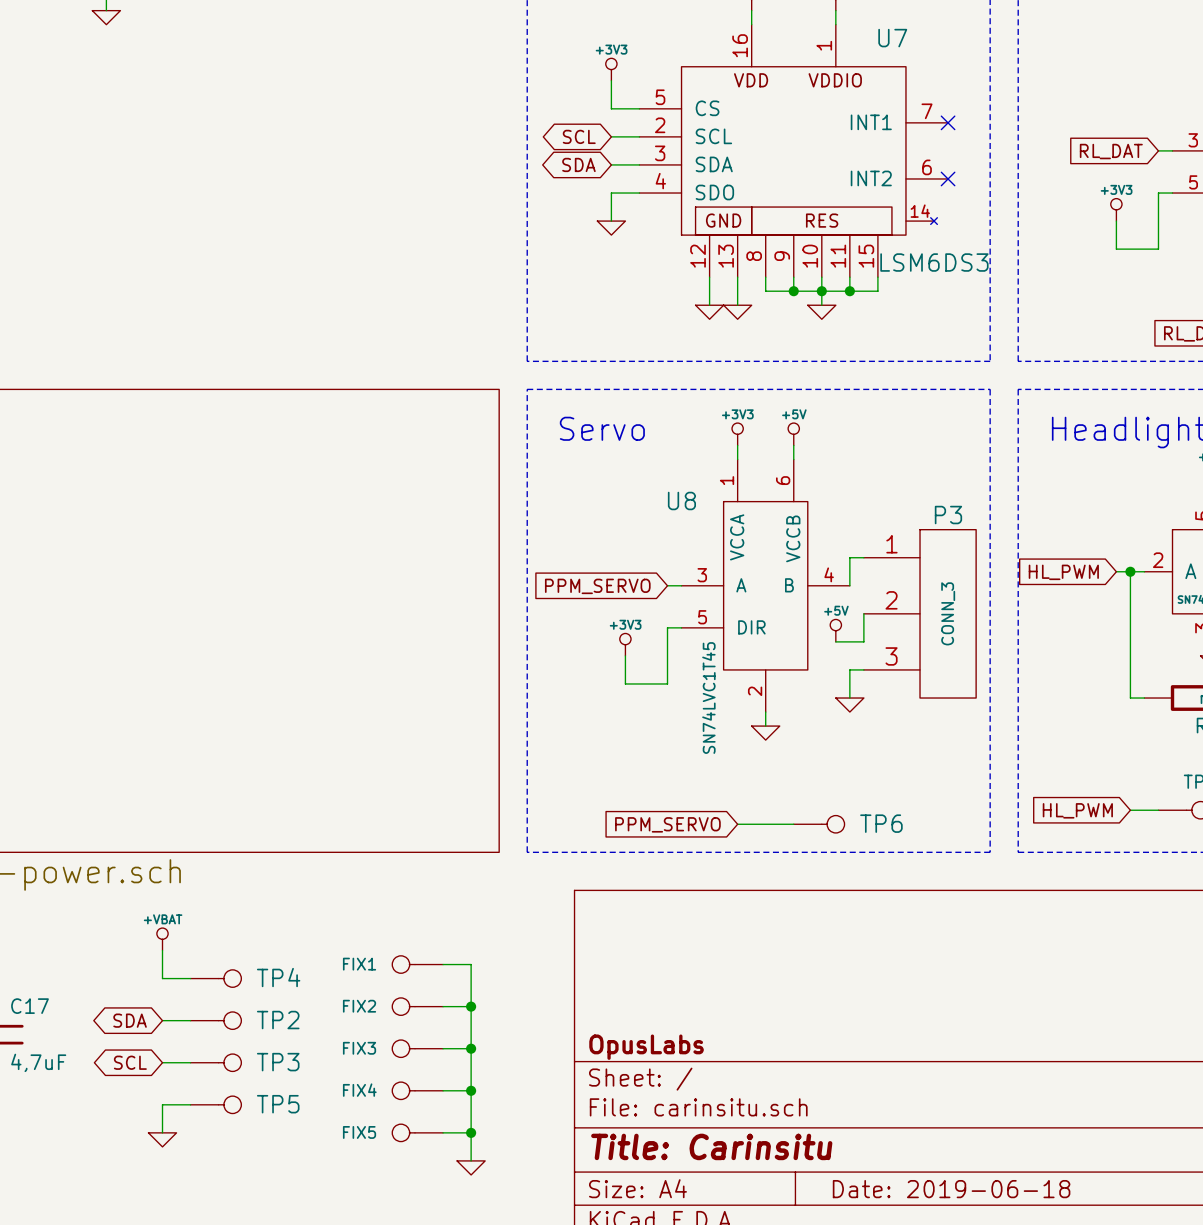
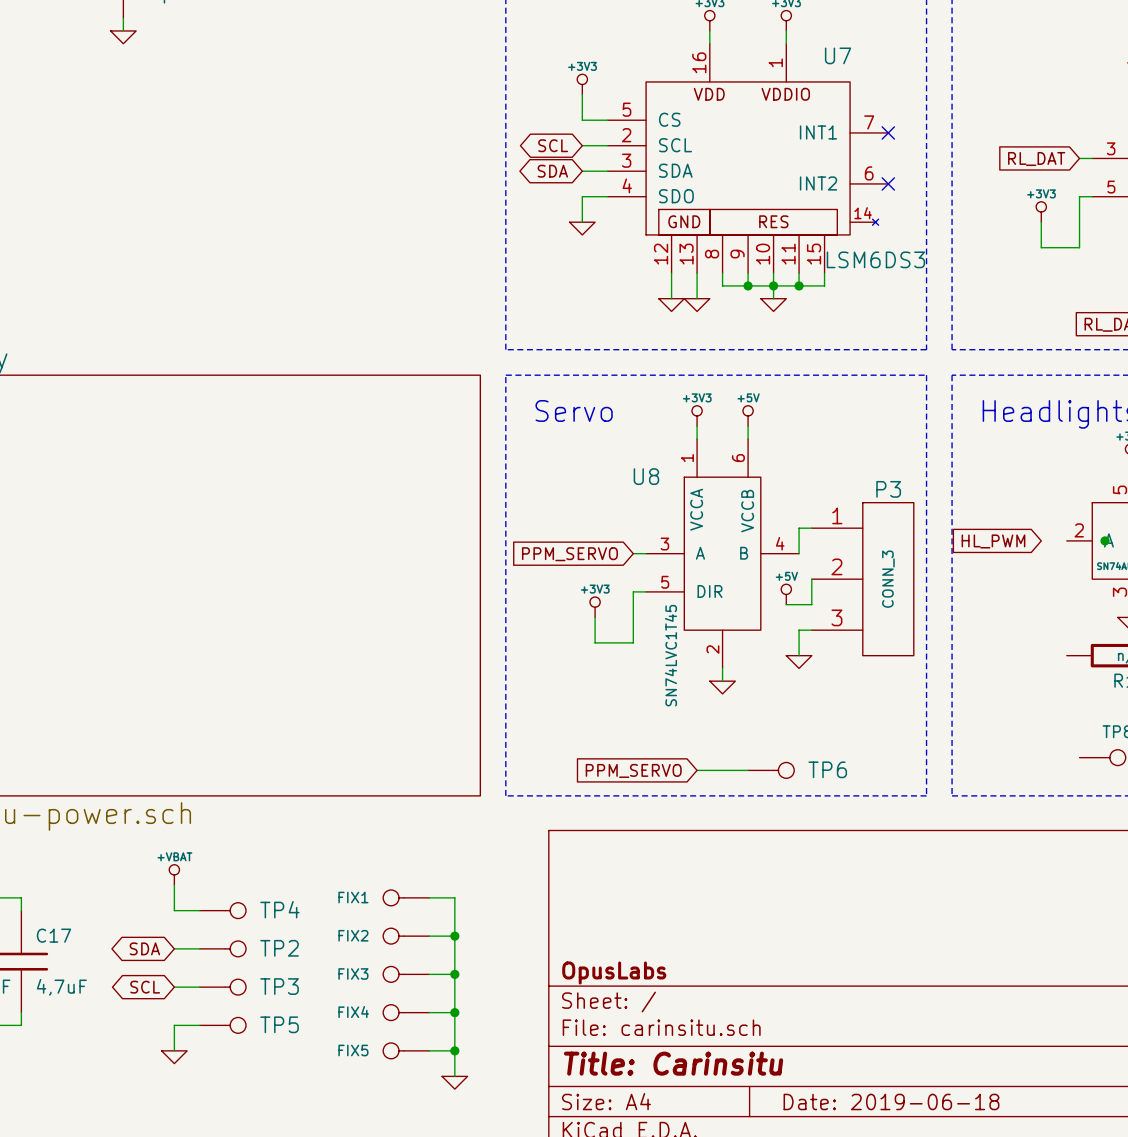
wire: (1116, 571) (1144, 571) -> none
wire: (1130, 571) (1130, 698) (1144, 698) -> none
junction: (1130, 571) -> none
junction: none -> (1105, 540)
global label: HL_PWM (1077, 810) -> none
wire: (1130, 810) (1158, 810) -> none

